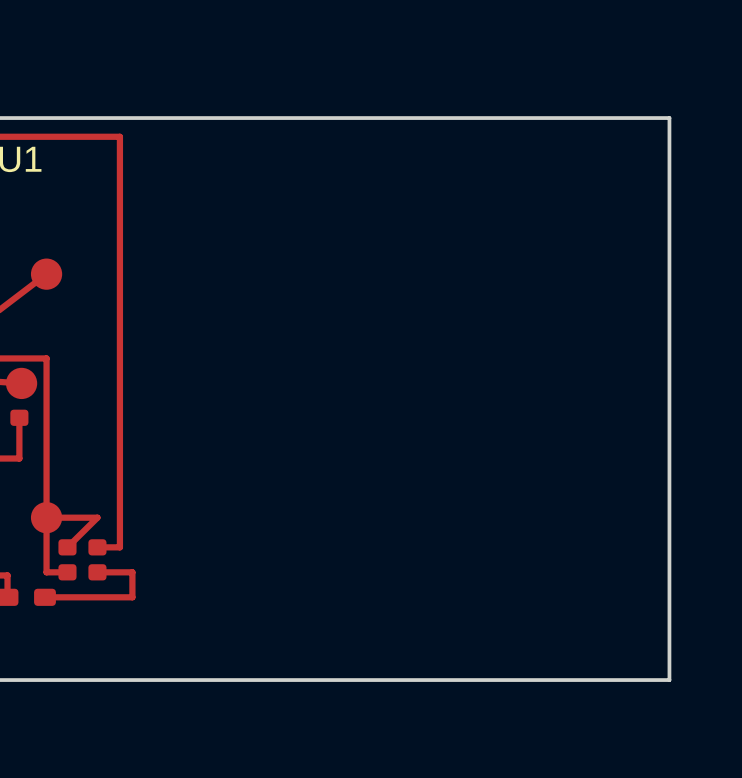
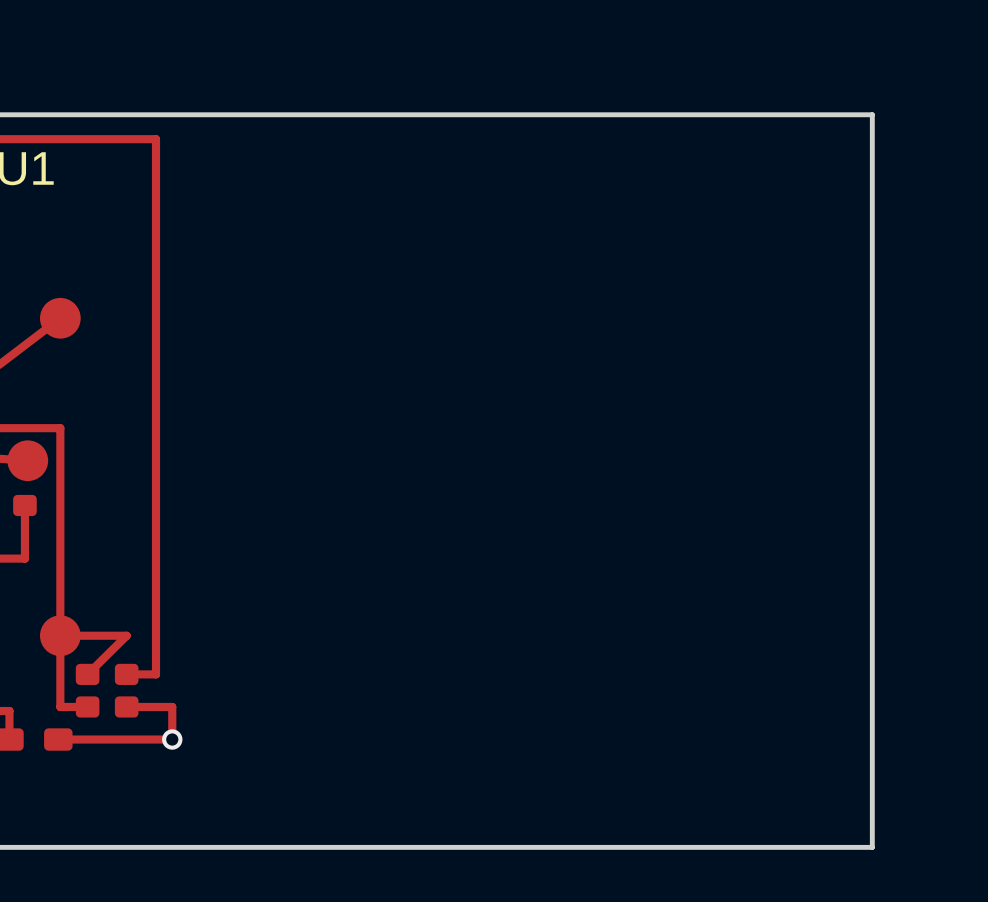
via: none -> (172, 739)

